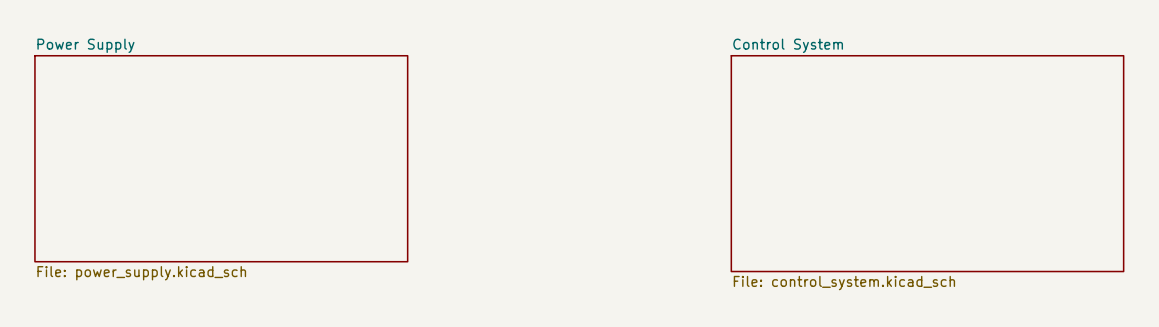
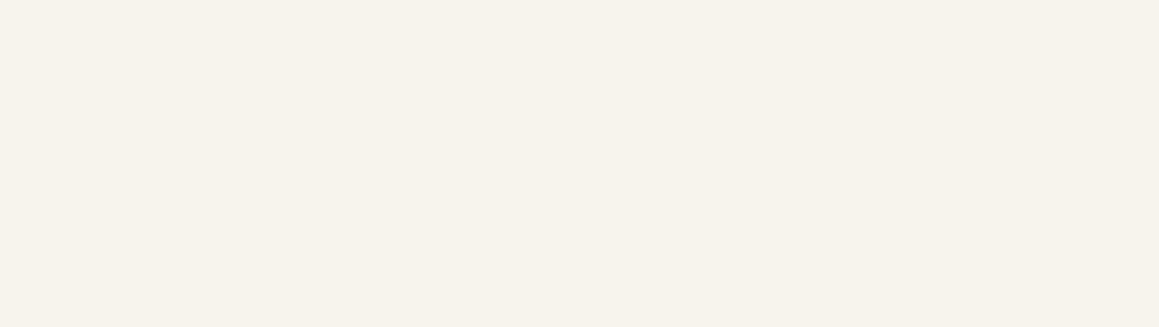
sheet Power Supply: File: power_supply.kicad_sch (221, 158) -> none
sheet Control System: File: control_system.kicad_sch (927, 163) -> none

